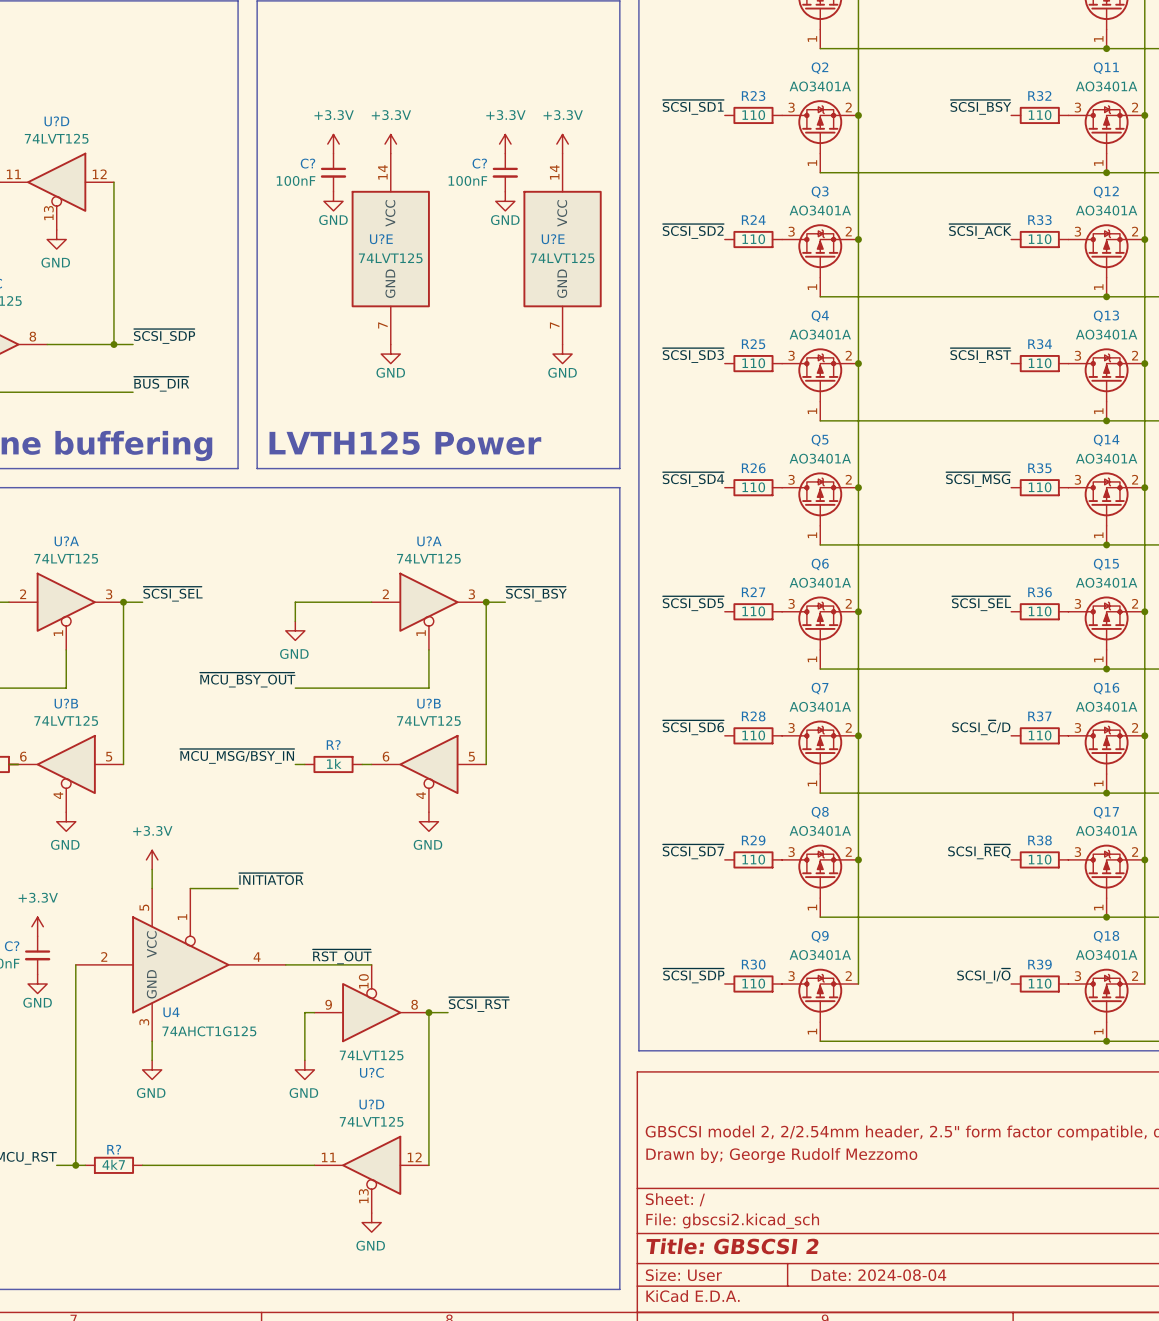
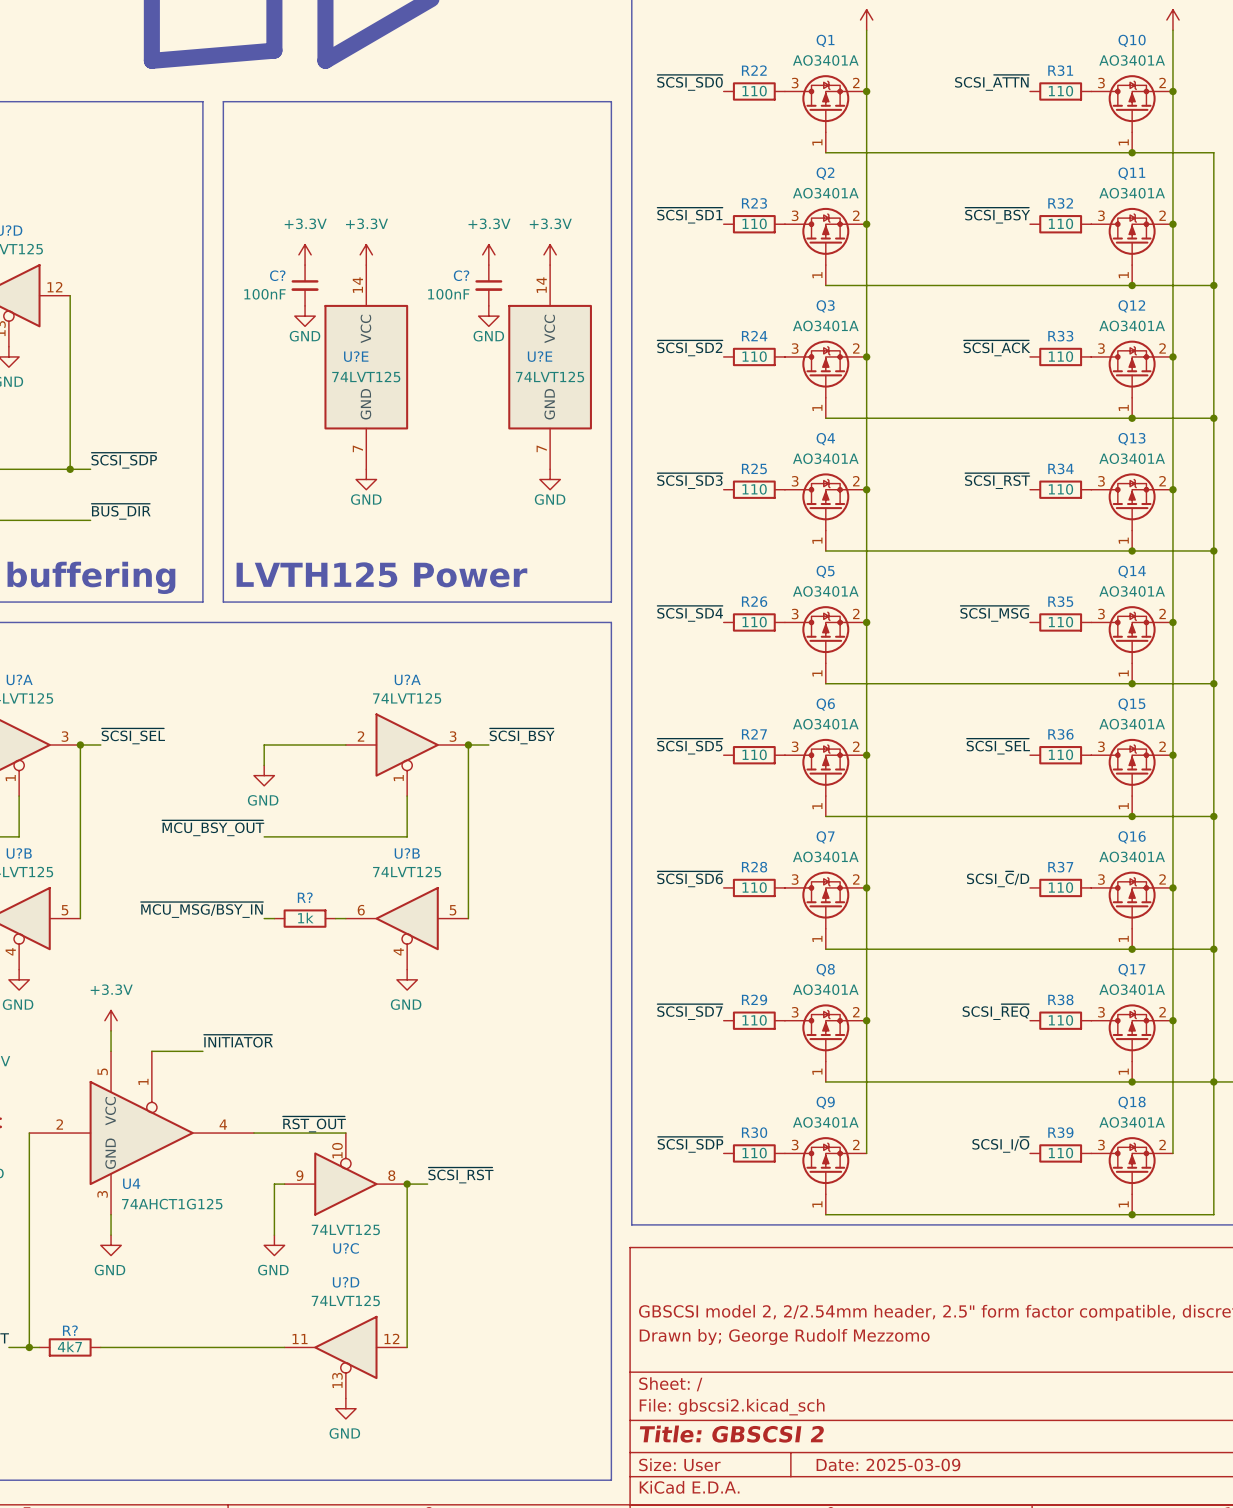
title block: Date: 2024-08-04 (878, 1275) -> Date: 2025-03-09 (888, 1464)

